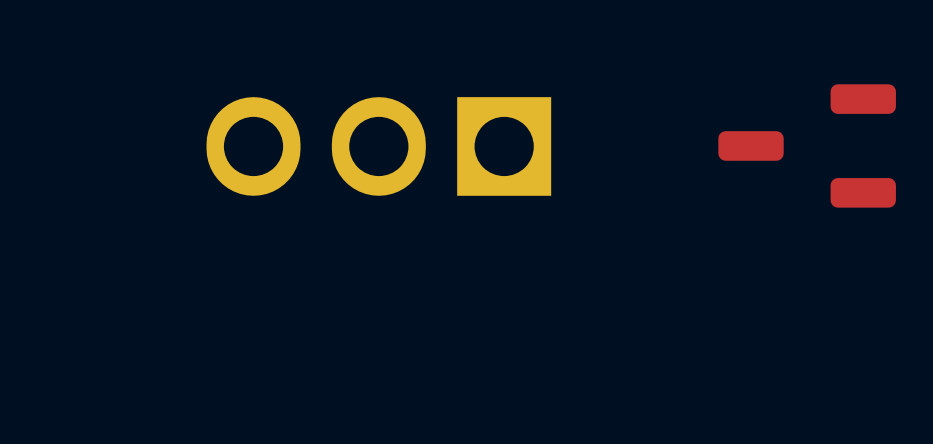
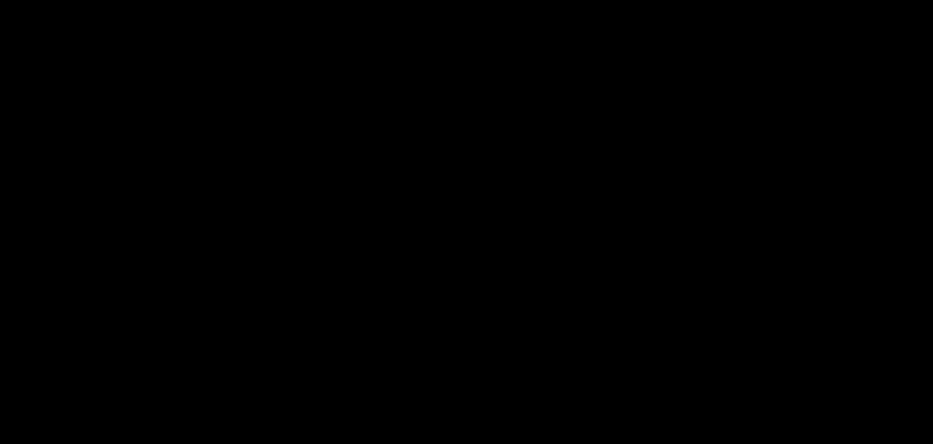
part: (807, 145) -> none
part: (378, 146) -> none

